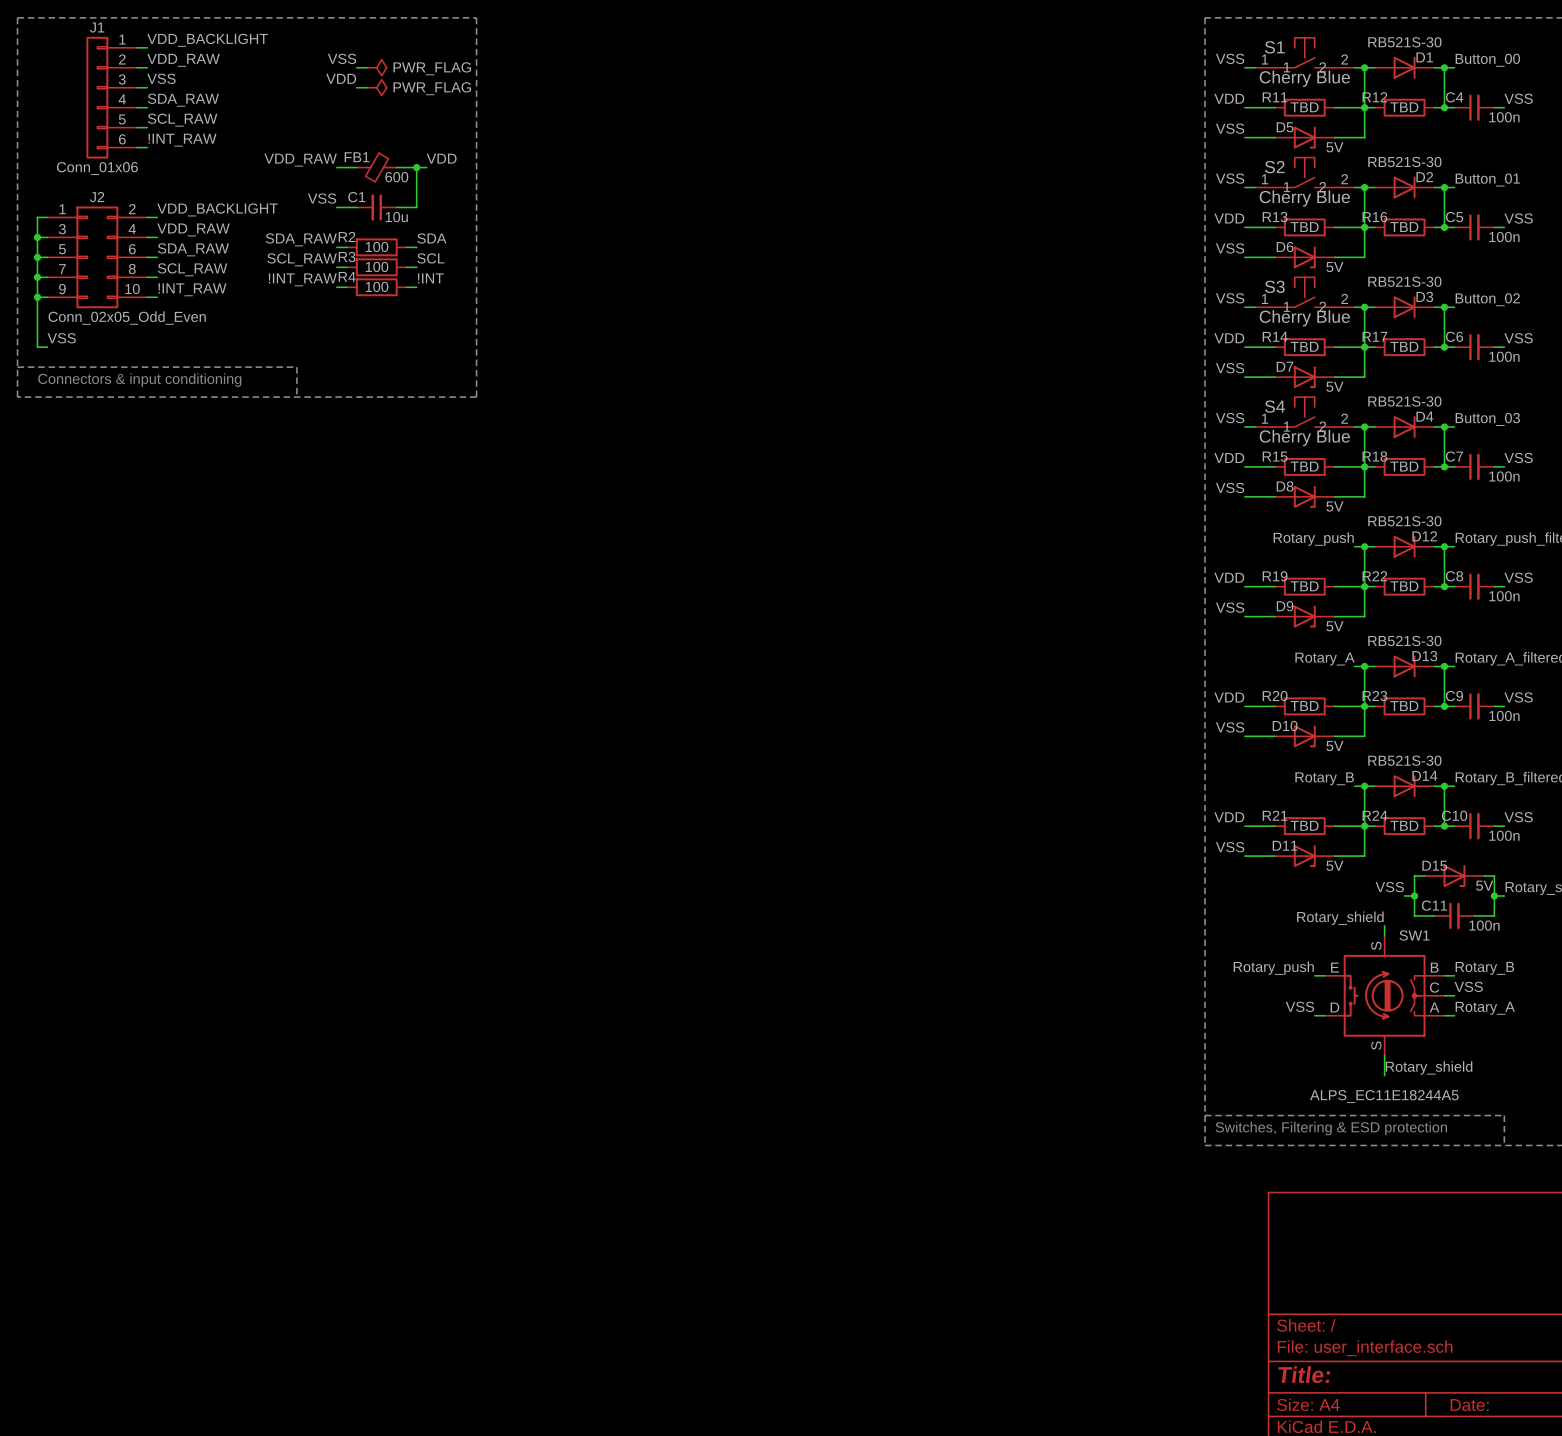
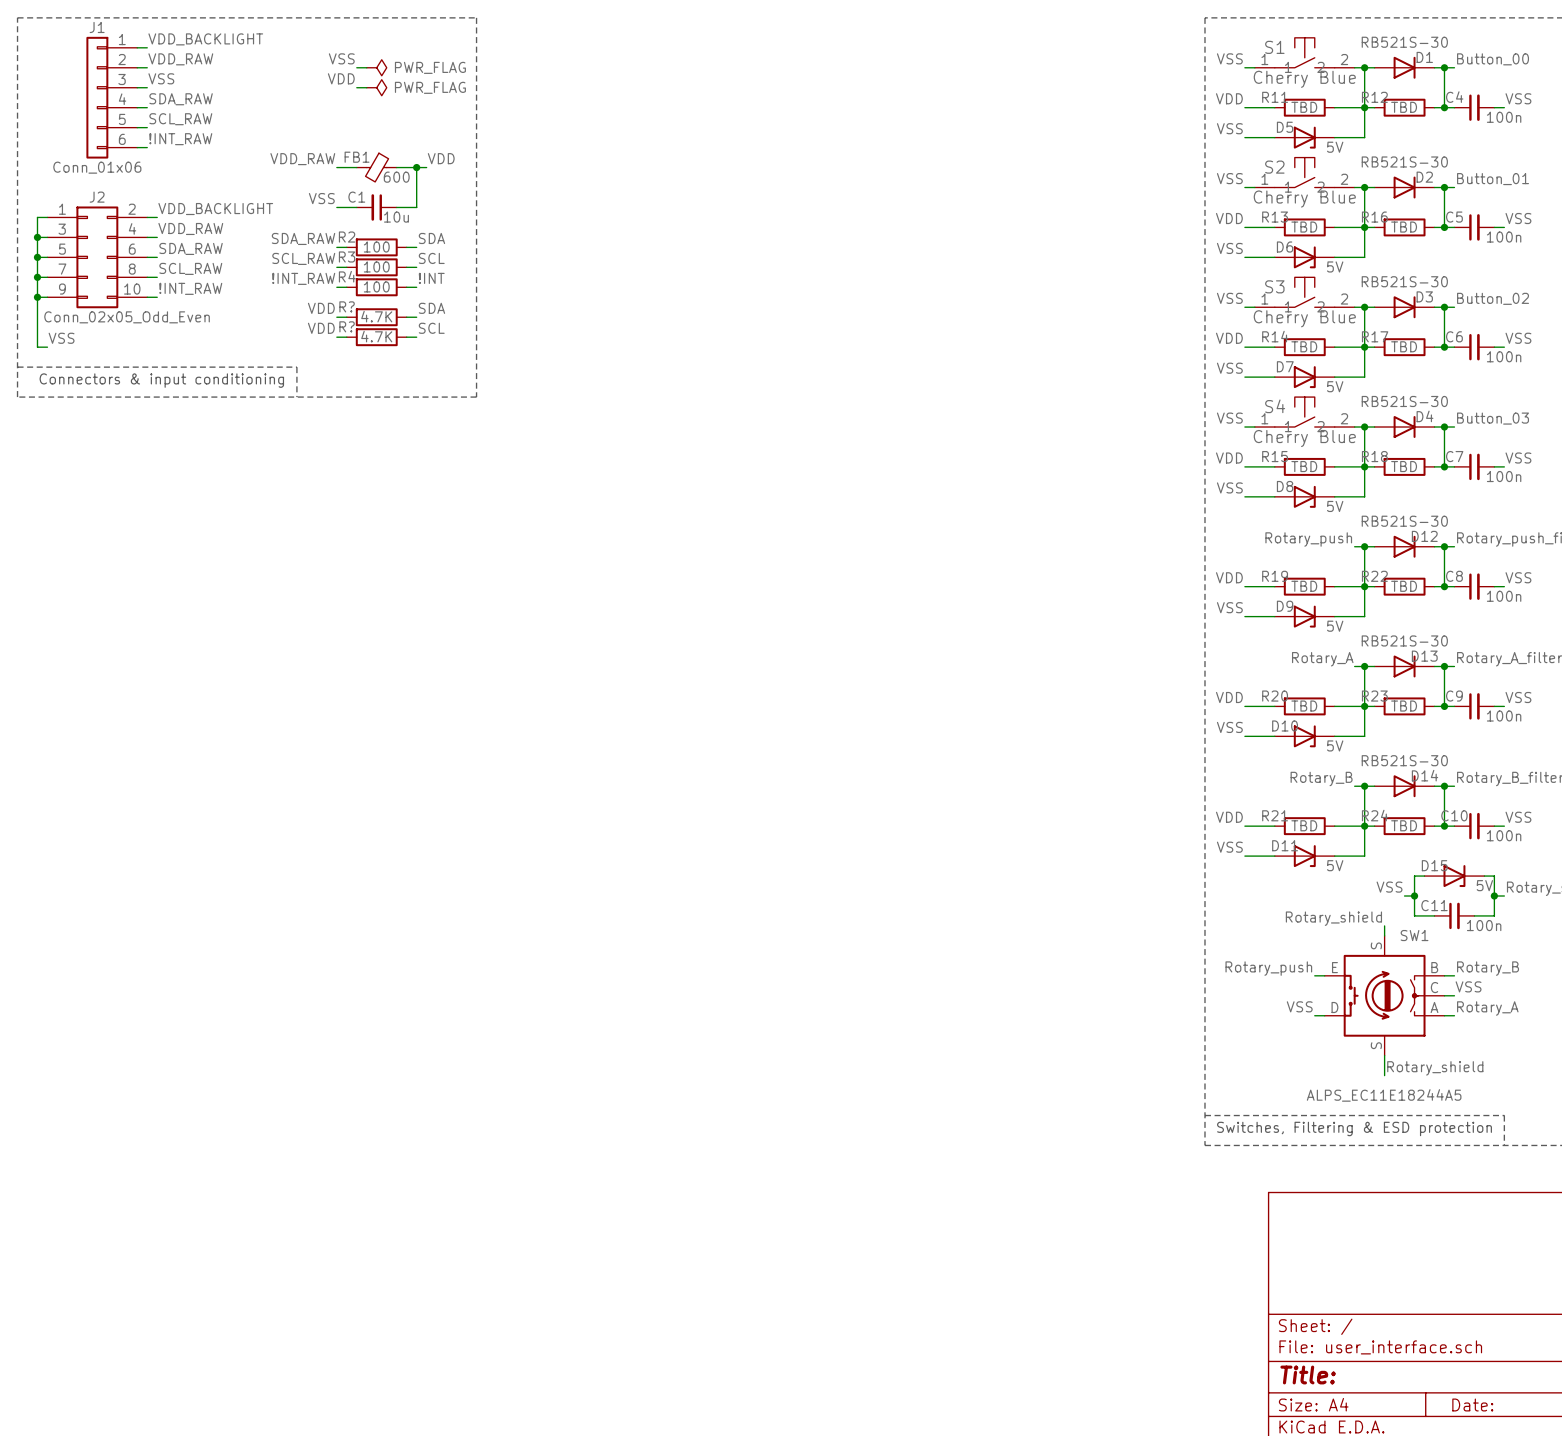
label: none -> VDD (321, 308)
label: none -> SDA (431, 308)
wire: none -> (336, 317) (346, 317)
R?: none -> 4.7K (376, 317)
wire: none -> (406, 317) (416, 317)
label: none -> VDD (321, 328)
label: none -> SCL (431, 328)
wire: none -> (336, 337) (346, 337)
R?: none -> 4.7K (376, 337)
wire: none -> (406, 337) (416, 337)

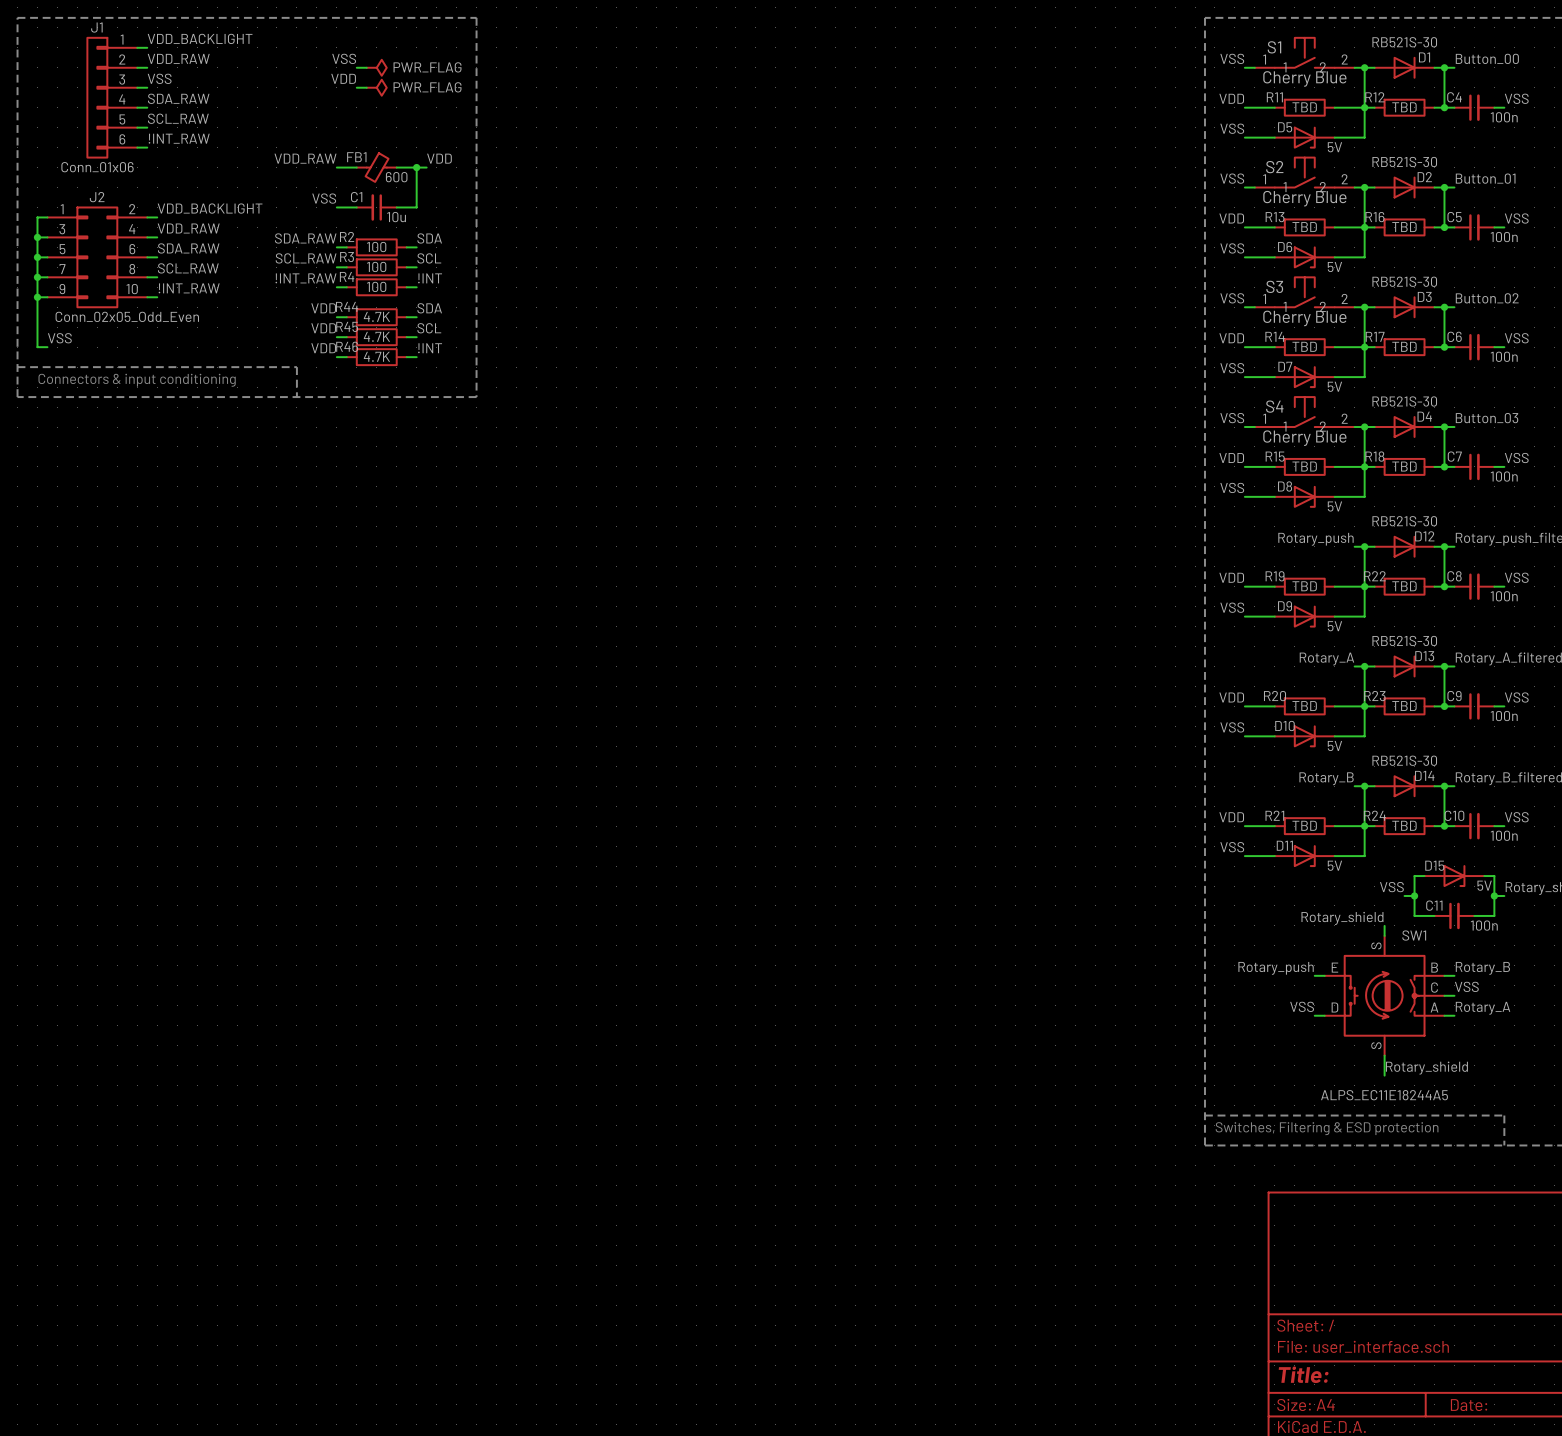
R? name: R? (347, 306) -> R44 (347, 306)
R? name: R? (347, 326) -> R45 (347, 326)
label: none -> VDD (323, 348)
label: none -> !INT (430, 348)
wire: none -> (336, 357) (346, 357)
R46: none -> 4.7K (376, 357)
wire: none -> (406, 357) (416, 357)

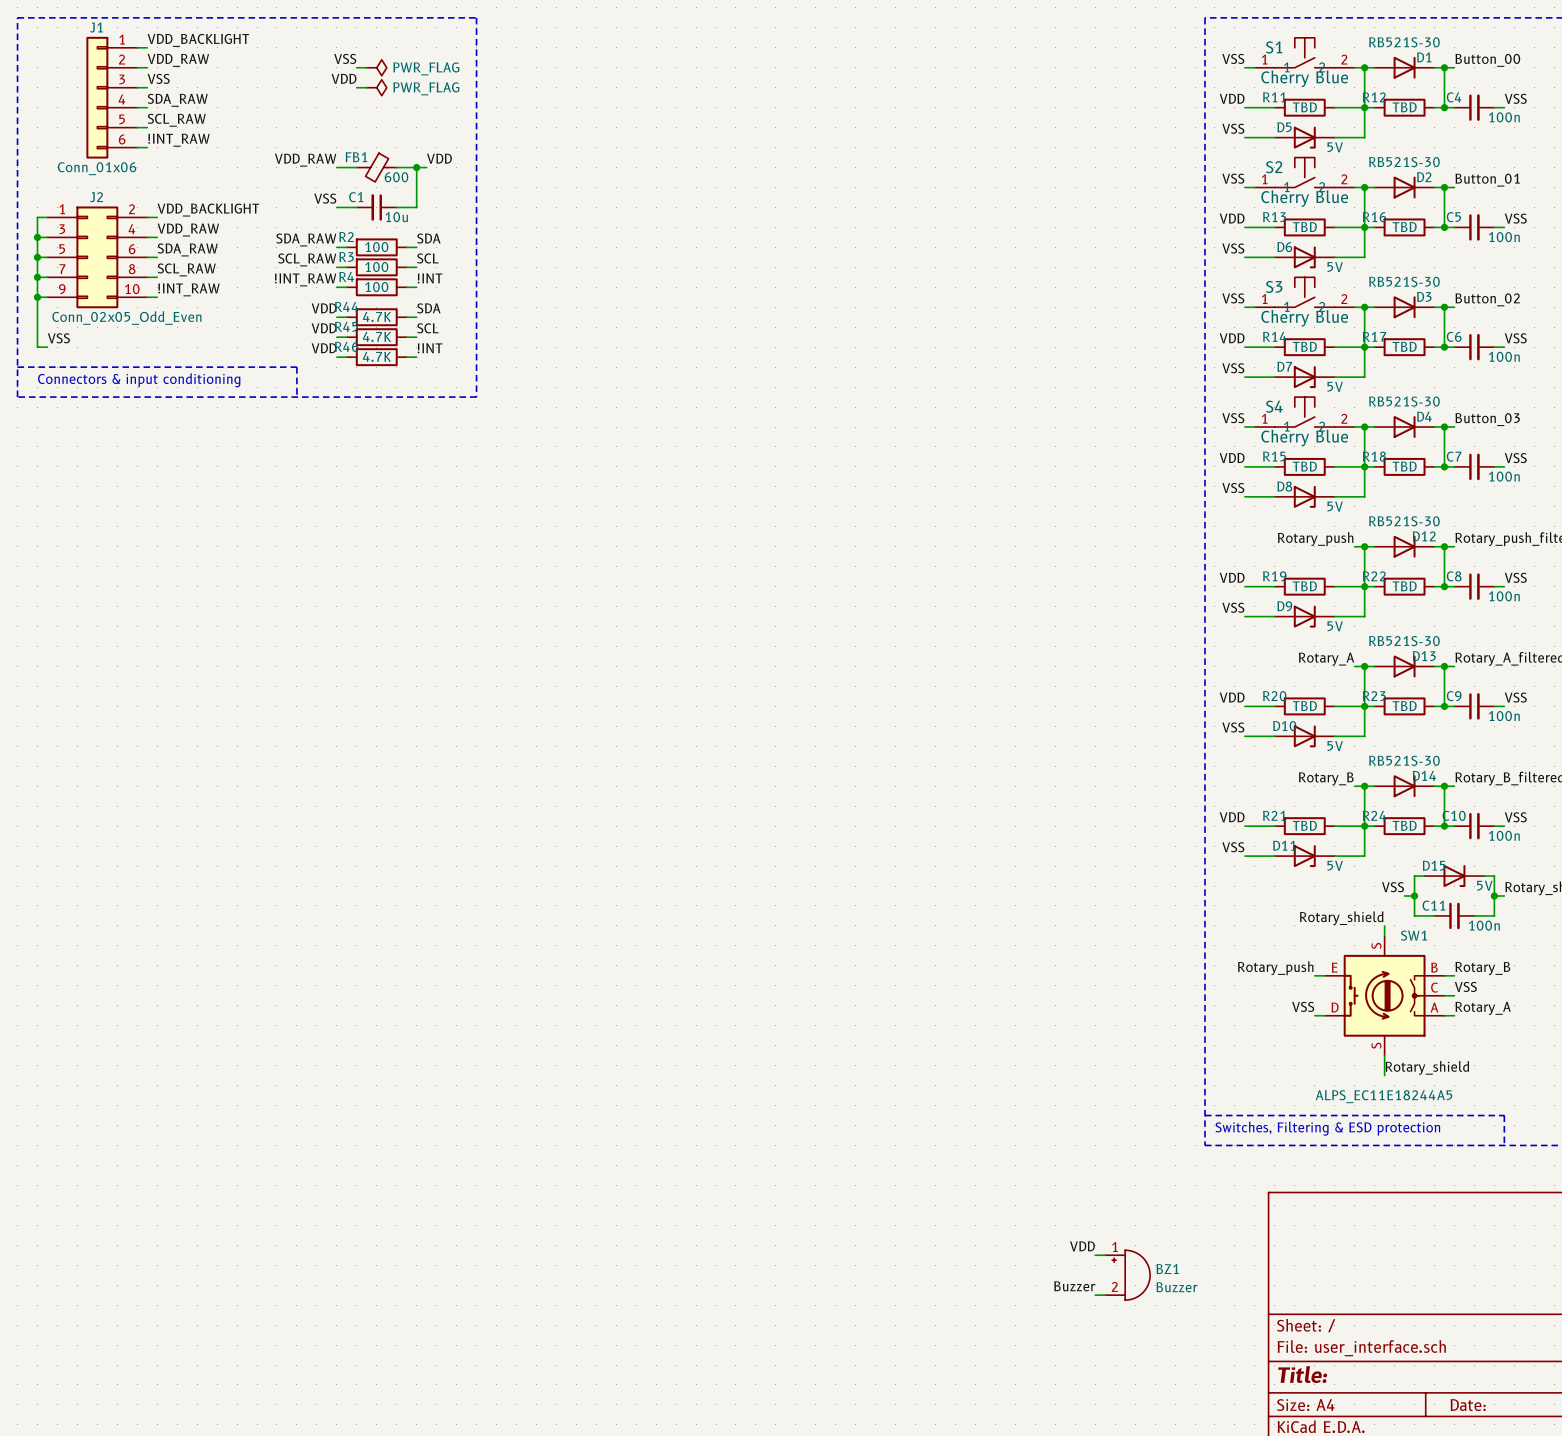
label: none -> VDD (1082, 1246)
wire: none -> (1095, 1255) (1105, 1255)
BZ1: none -> Buzzer (1127, 1275)
label: none -> Buzzer (1074, 1286)
wire: none -> (1095, 1295) (1105, 1295)

